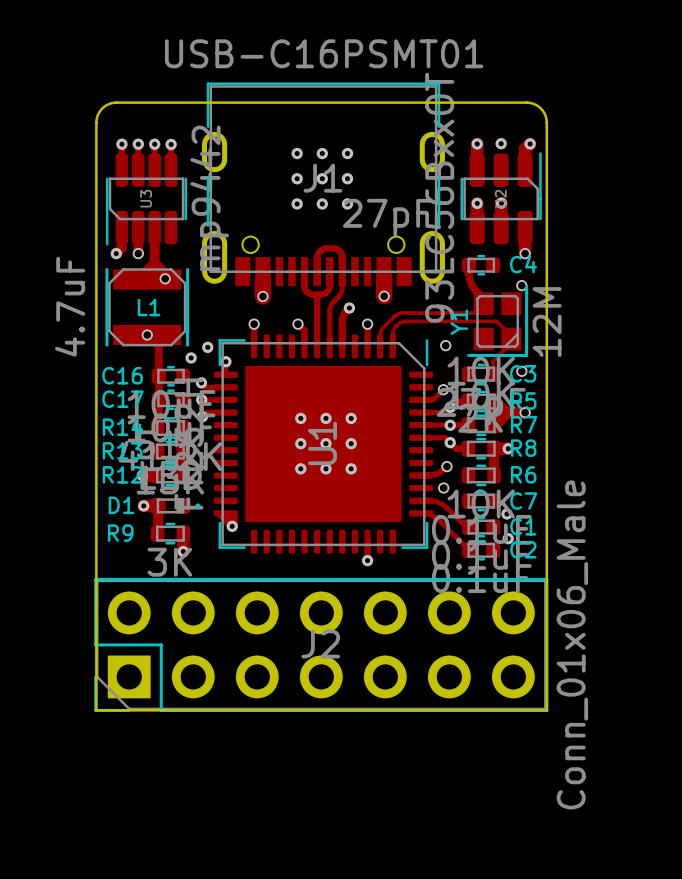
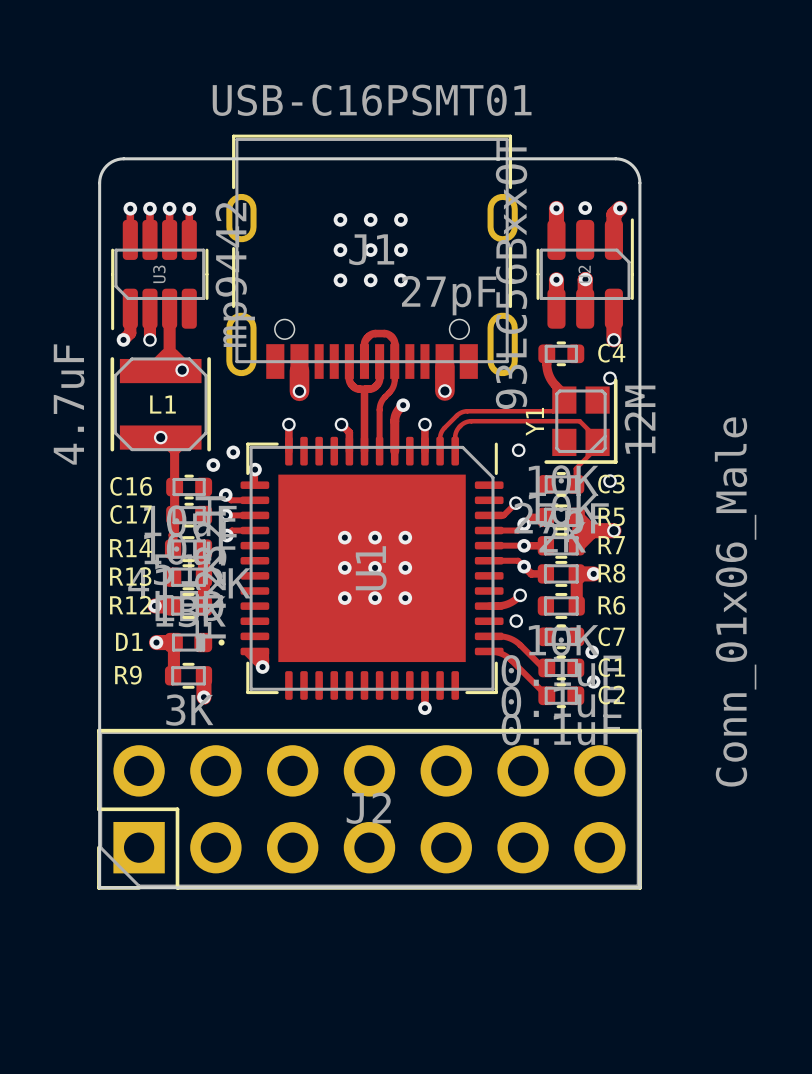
J2 value position: Conn_01x06_Male (572, 644) -> Conn_01x06_Male (735, 602)

